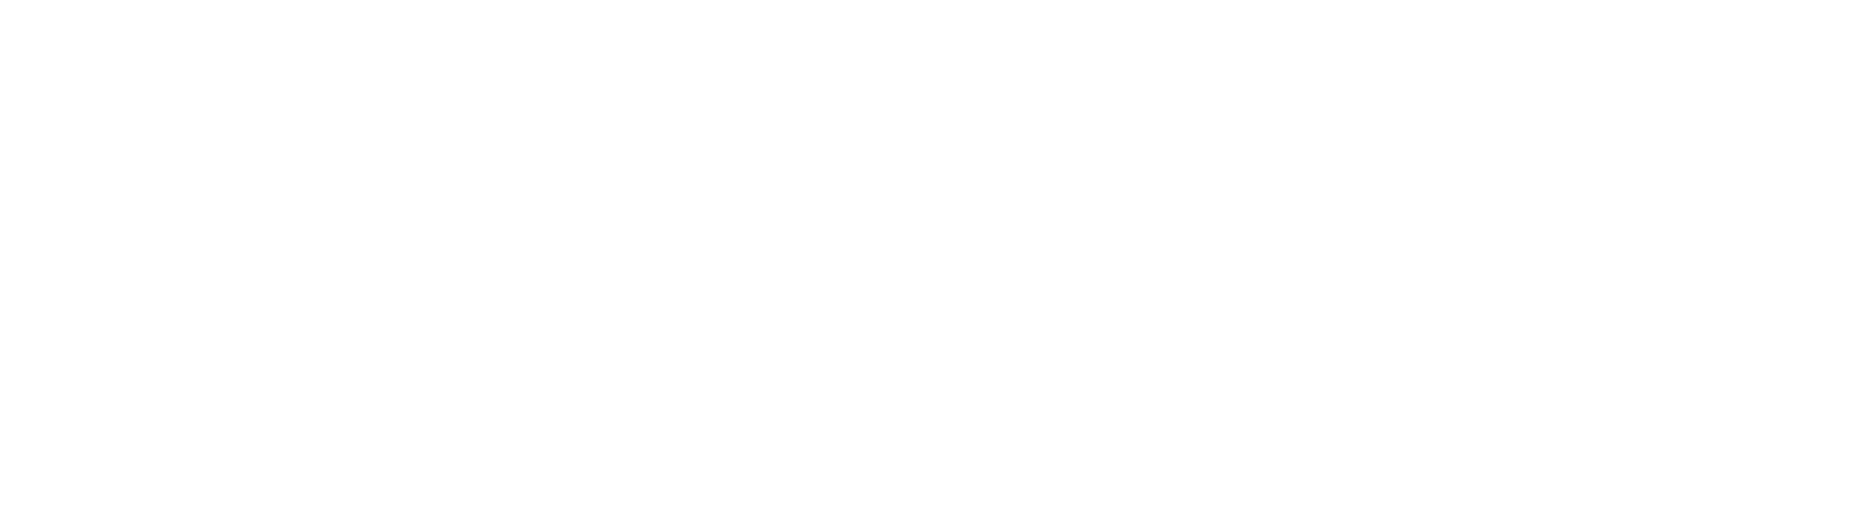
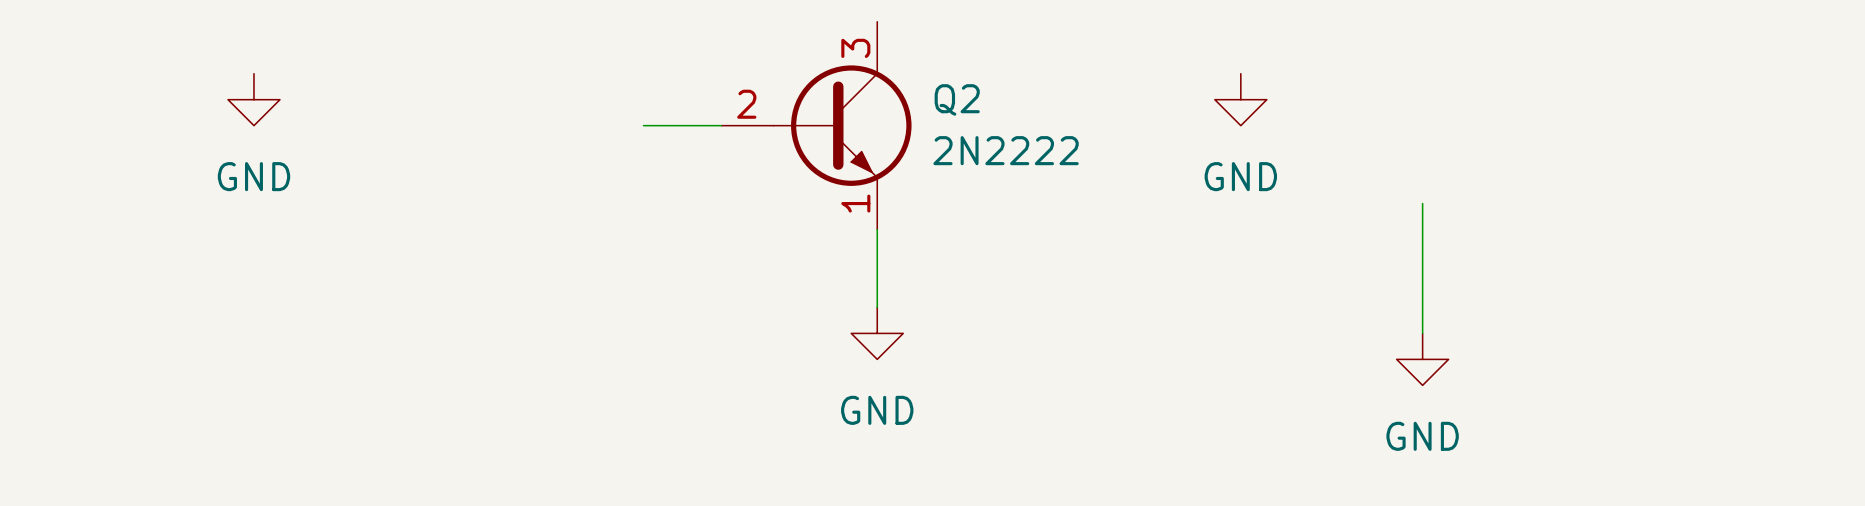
power symbol: none -> GND (253, 99)
power symbol: none -> GND (1240, 99)
wire: none -> (643, 125) (721, 125)
Q2: none -> 2N2222 (816, 125)
wire: none -> (1422, 203) (1422, 333)
wire: none -> (877, 229) (877, 307)
power symbol: none -> GND (877, 333)
power symbol: none -> GND (1422, 359)

